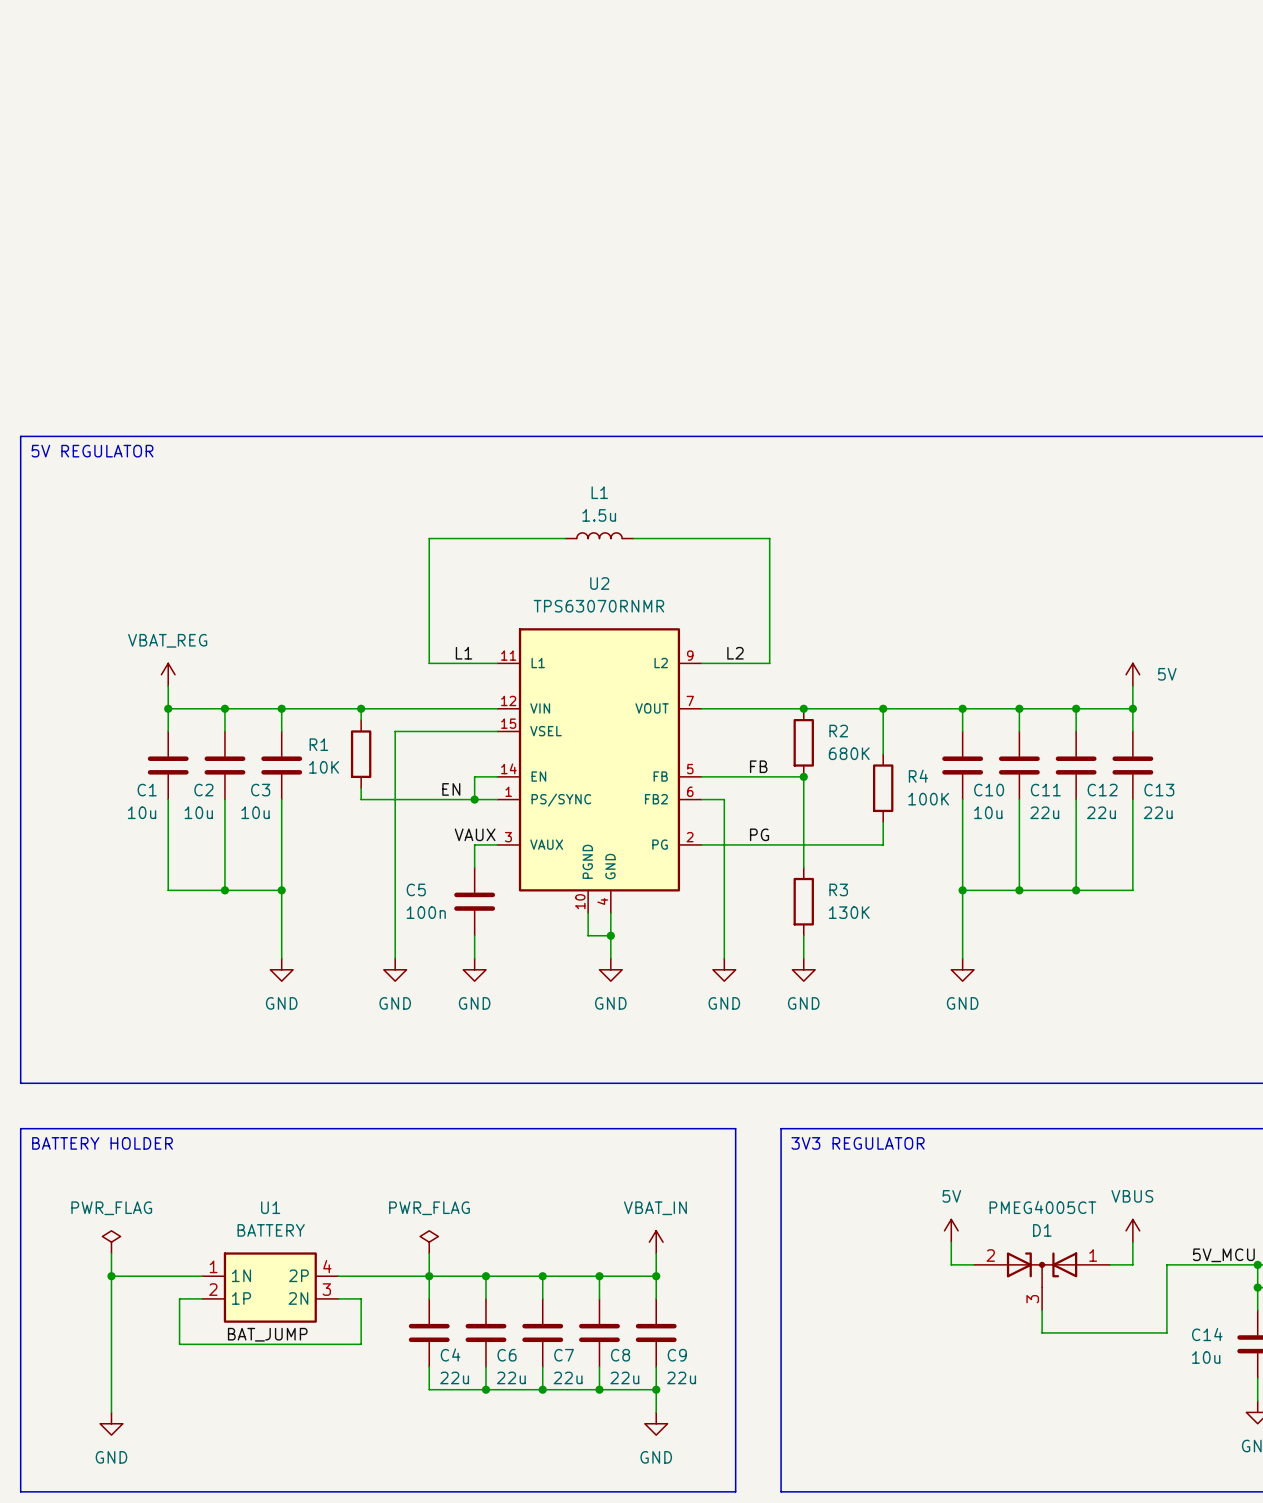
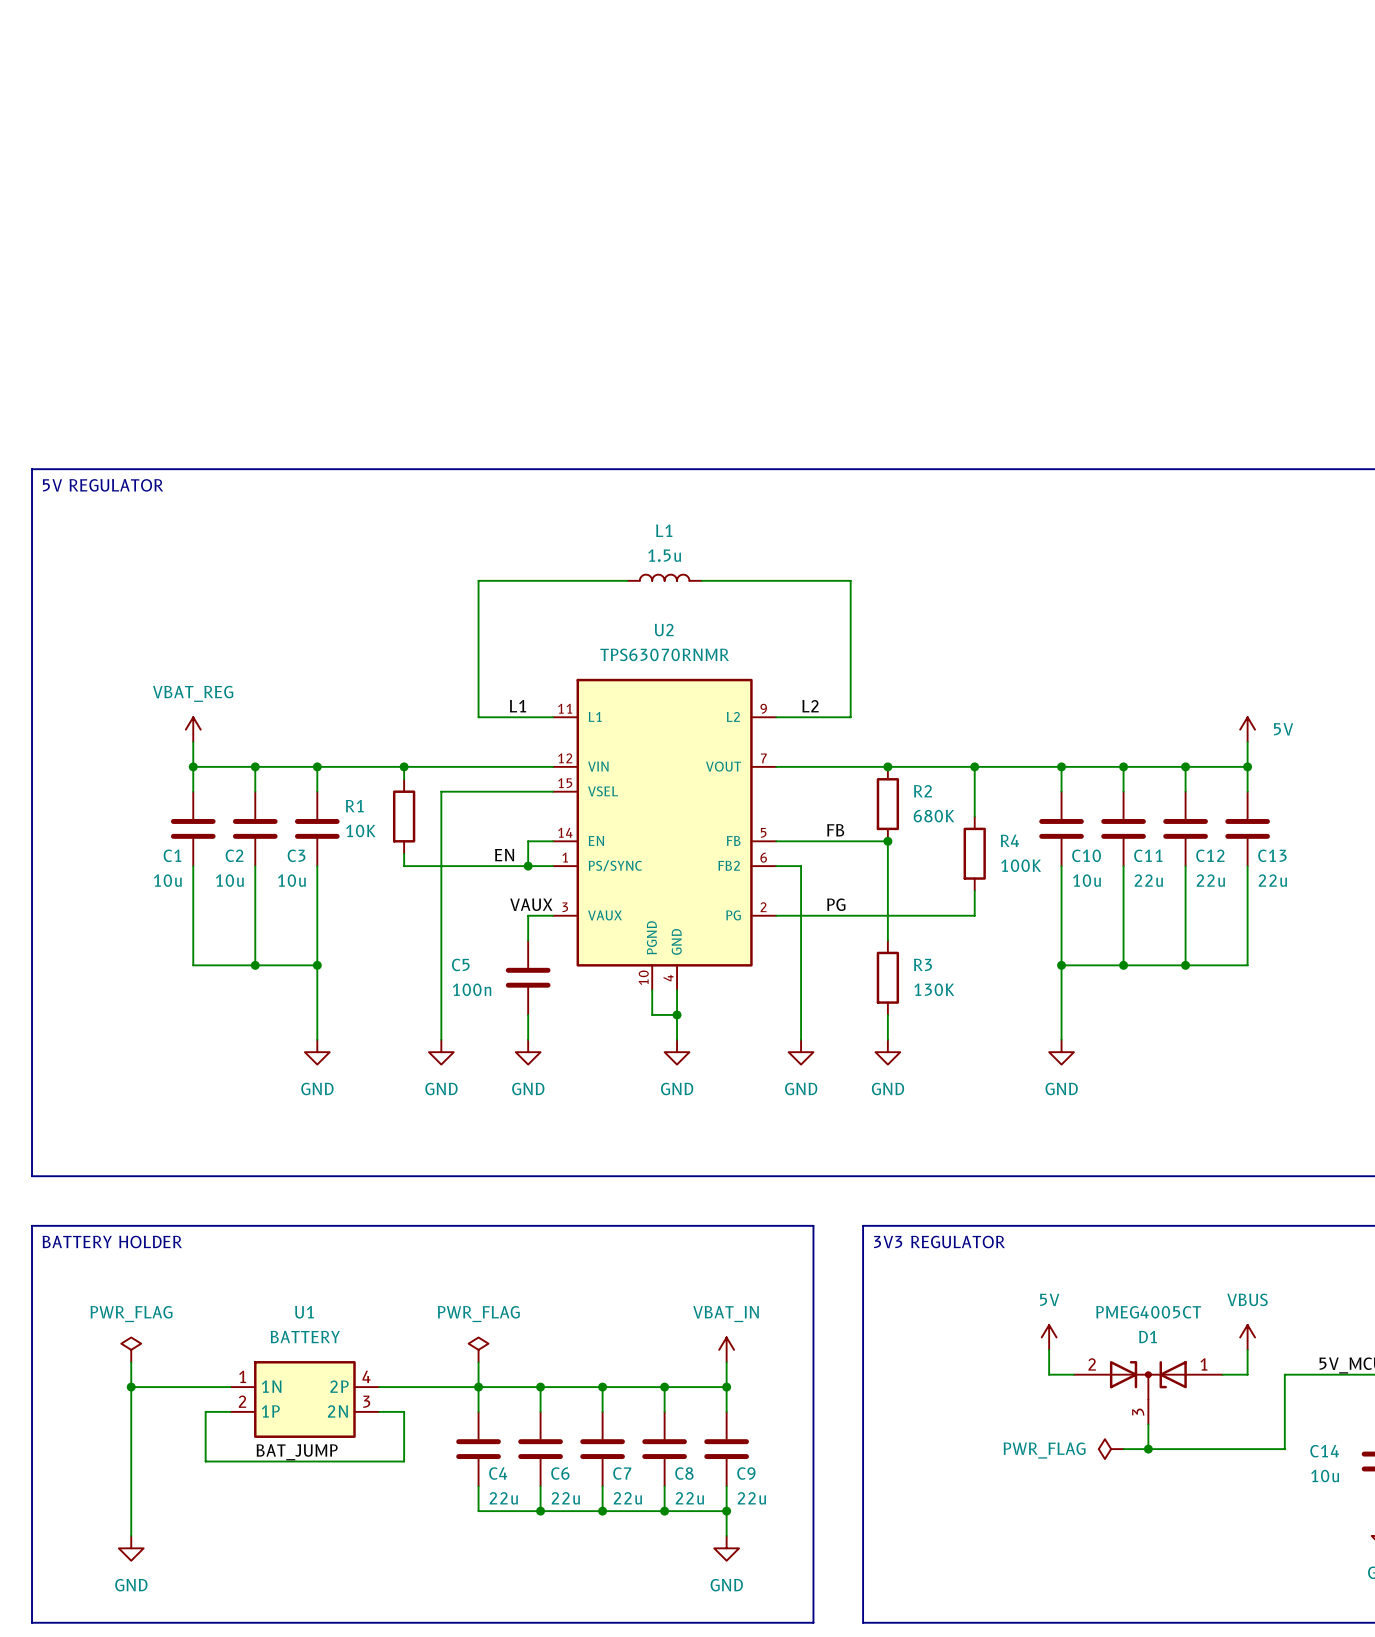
power symbol: none -> PWR_FLAG (1111, 1449)
wire: none -> (1123, 1449) (1148, 1449)
junction: none -> (1148, 1449)

